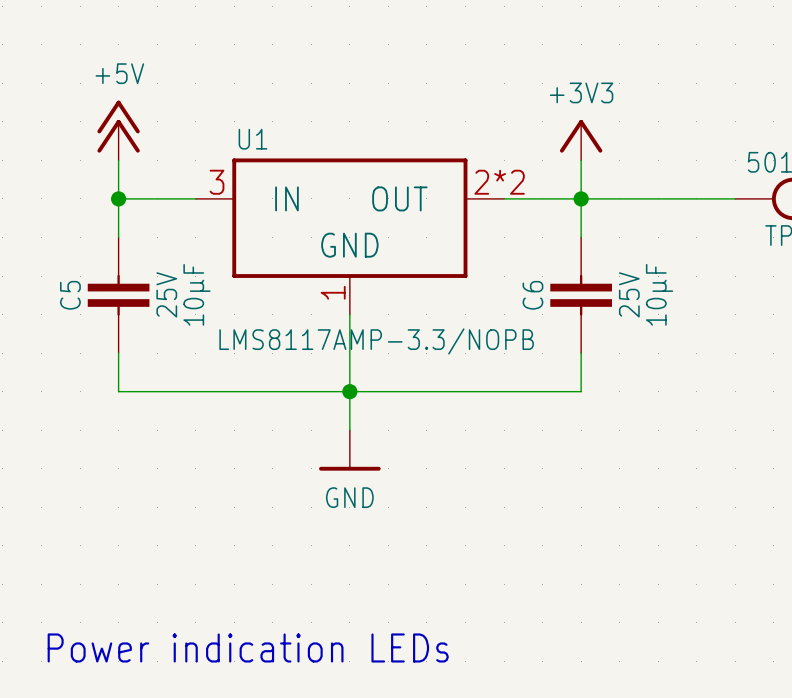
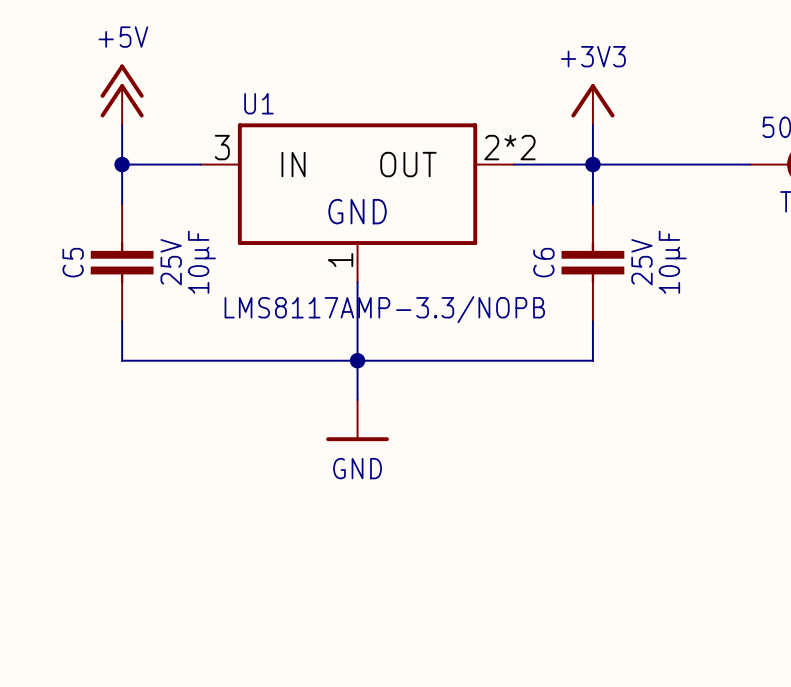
text: Power indication LEDs (248, 647) -> none

